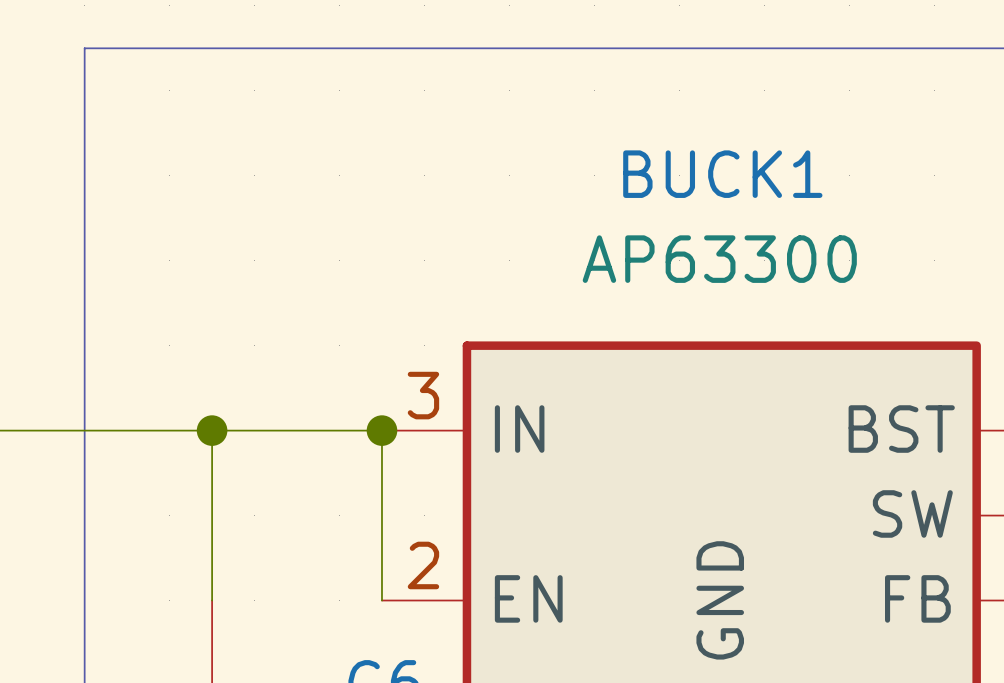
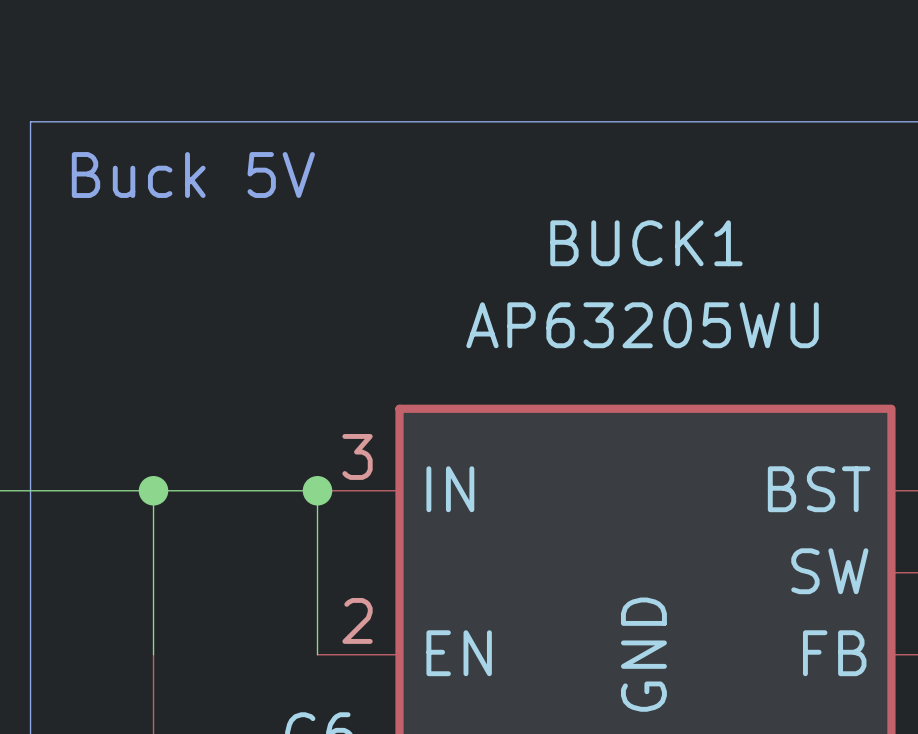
text: none -> Buck 5V (193, 175)
BUCK1 value: AP63300 (719, 259) -> AP63205WU (642, 325)

